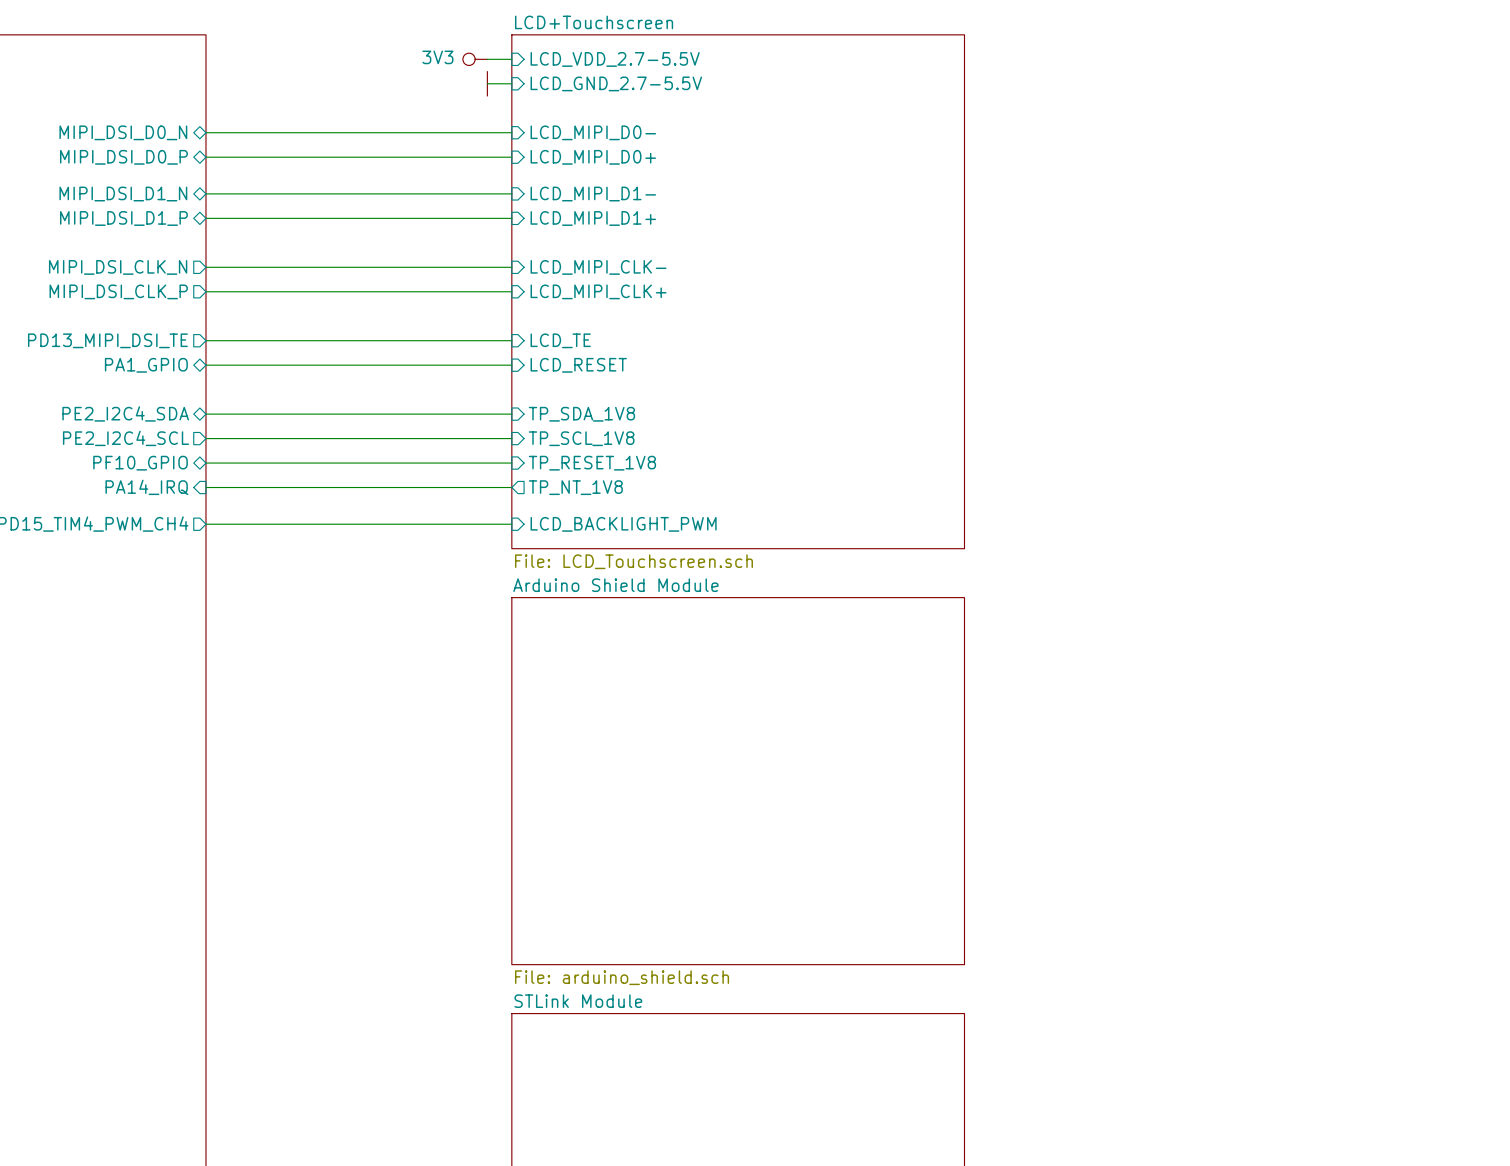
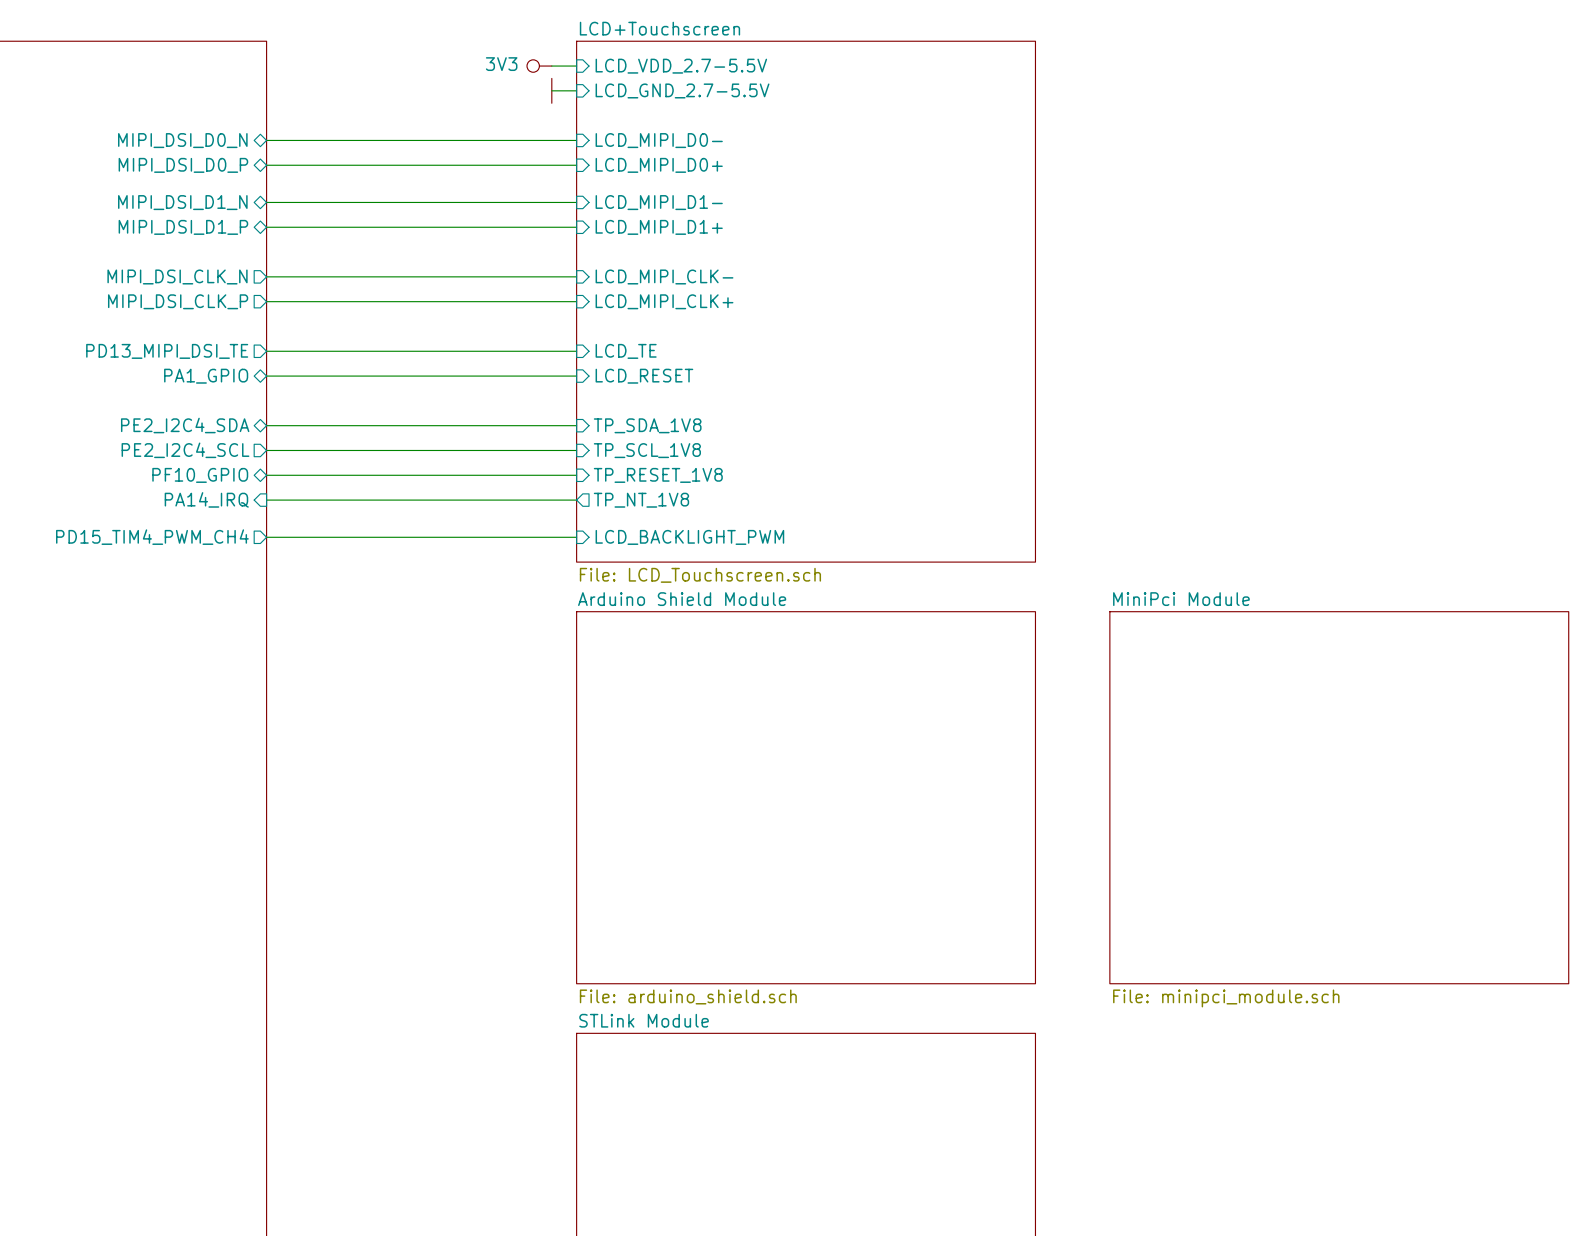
sheet MiniPci Module: none -> File: minipci_module.sch (1339, 797)

